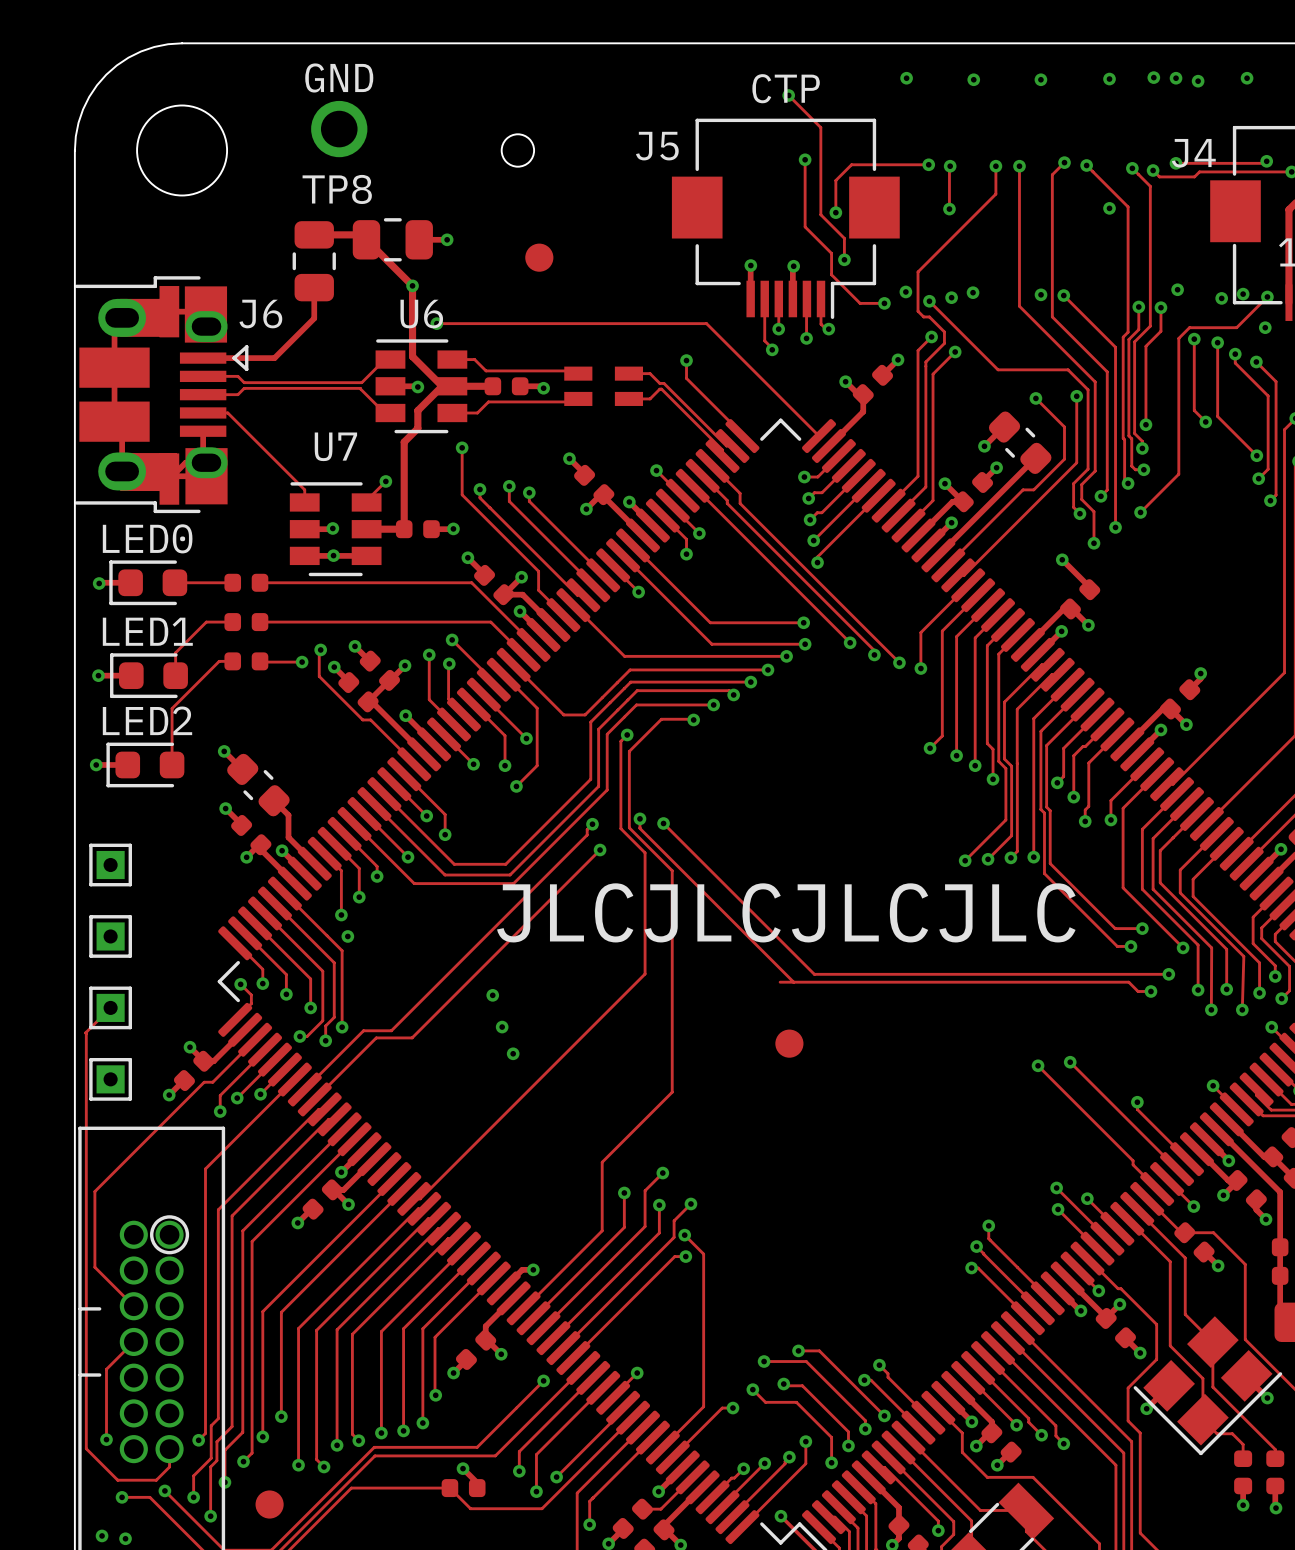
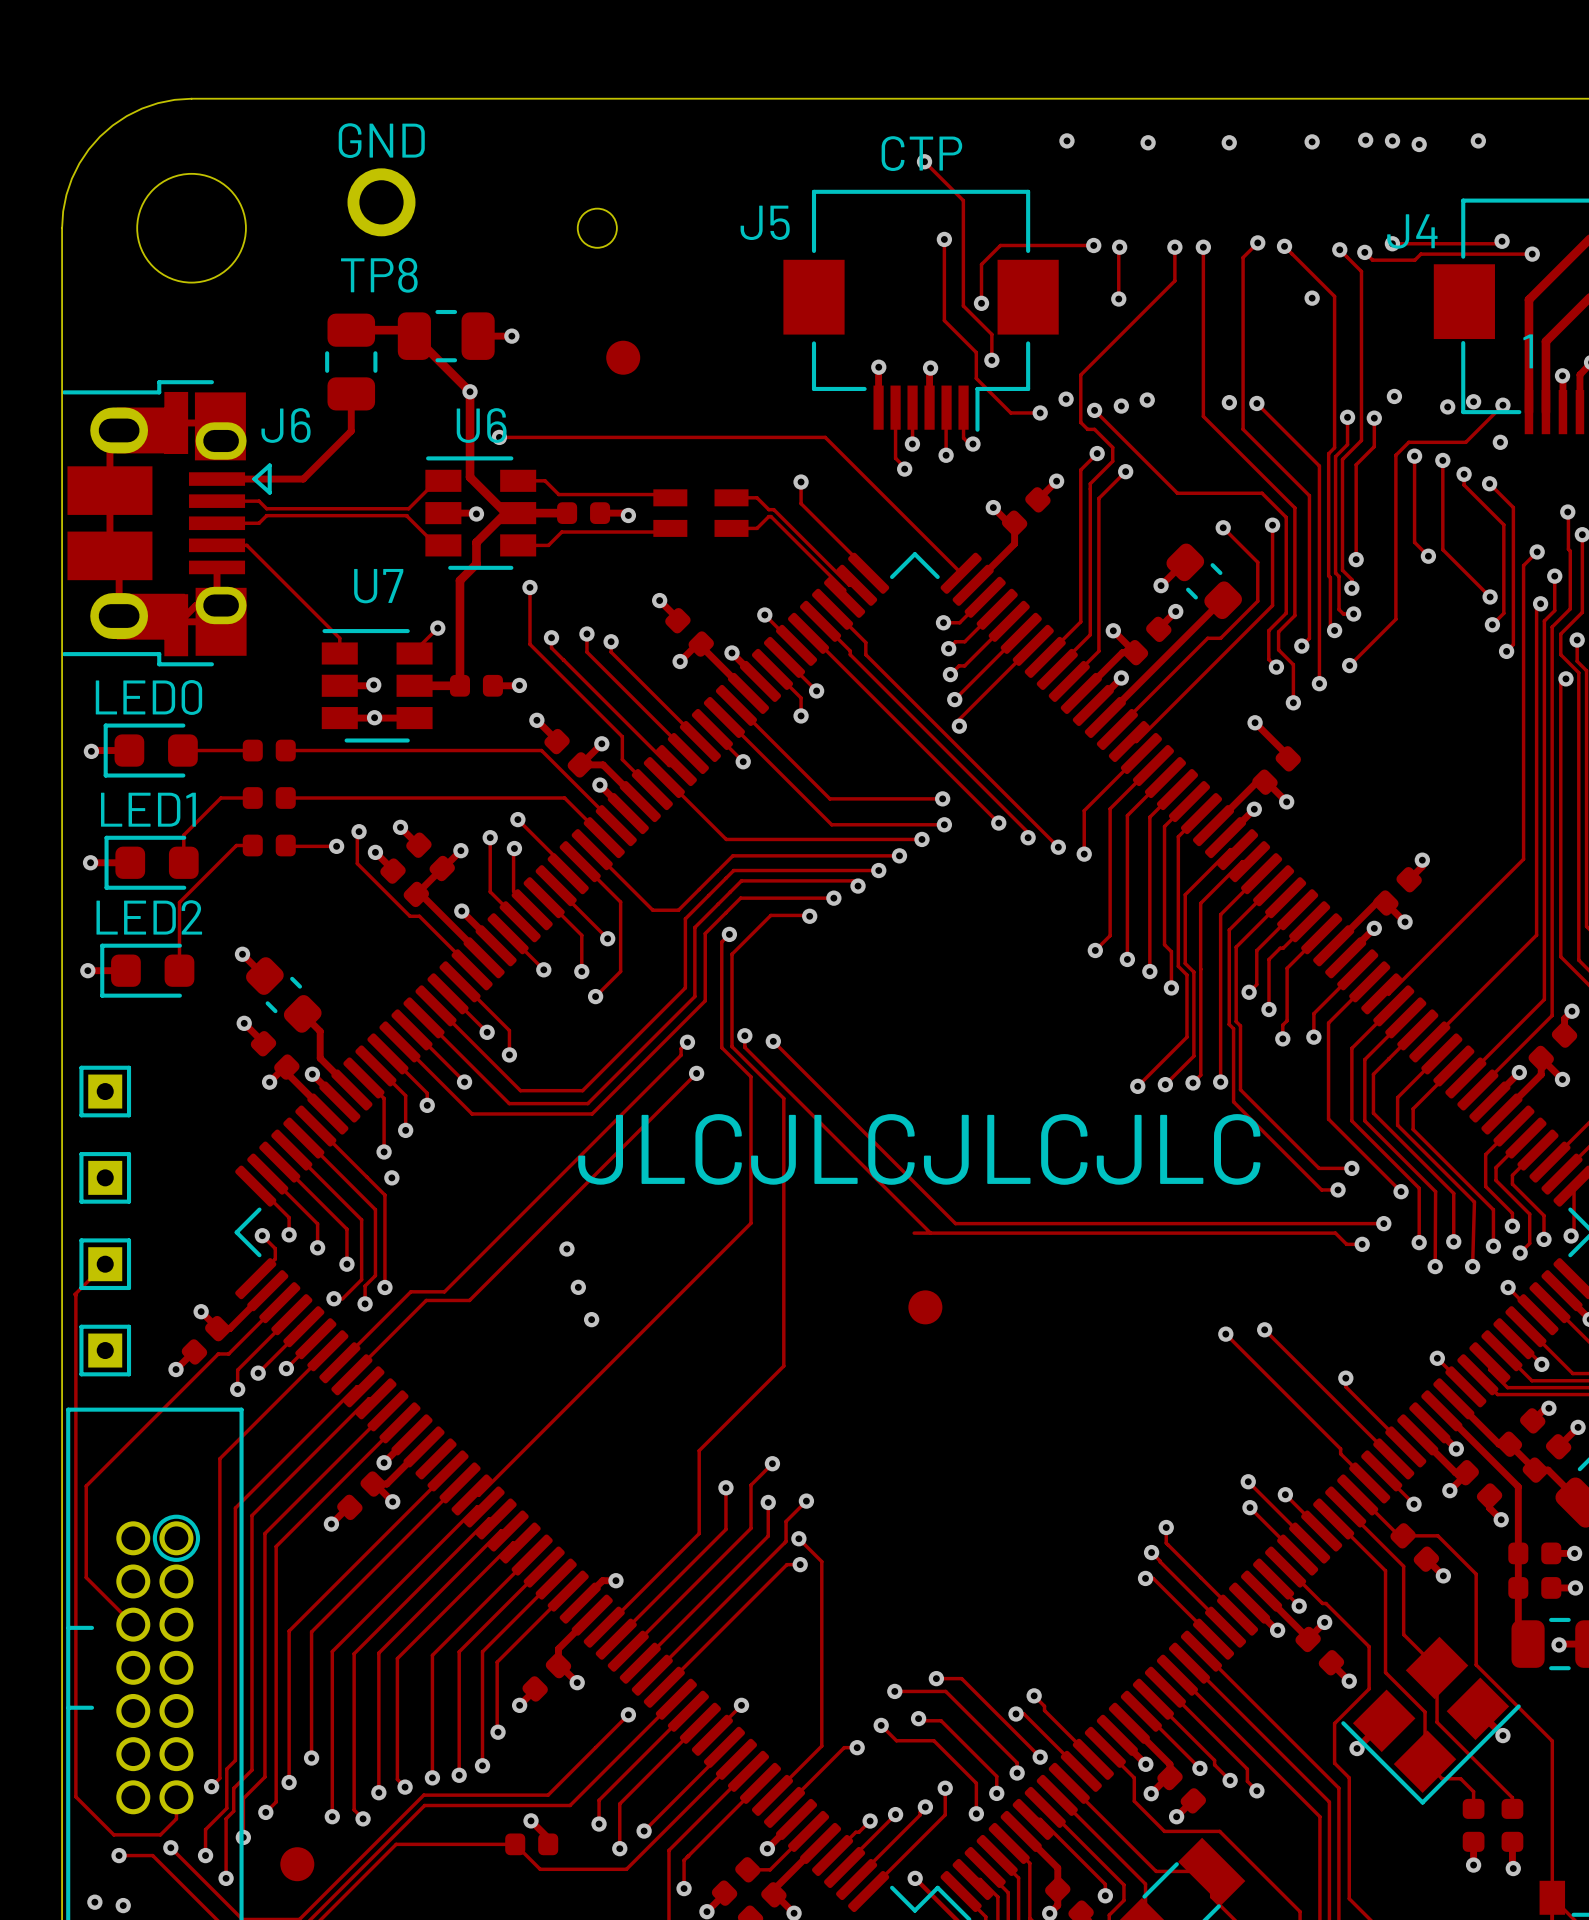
track: (133, 1341) (106, 1369) (106, 1439) -> none
via: (106, 1439) -> none

